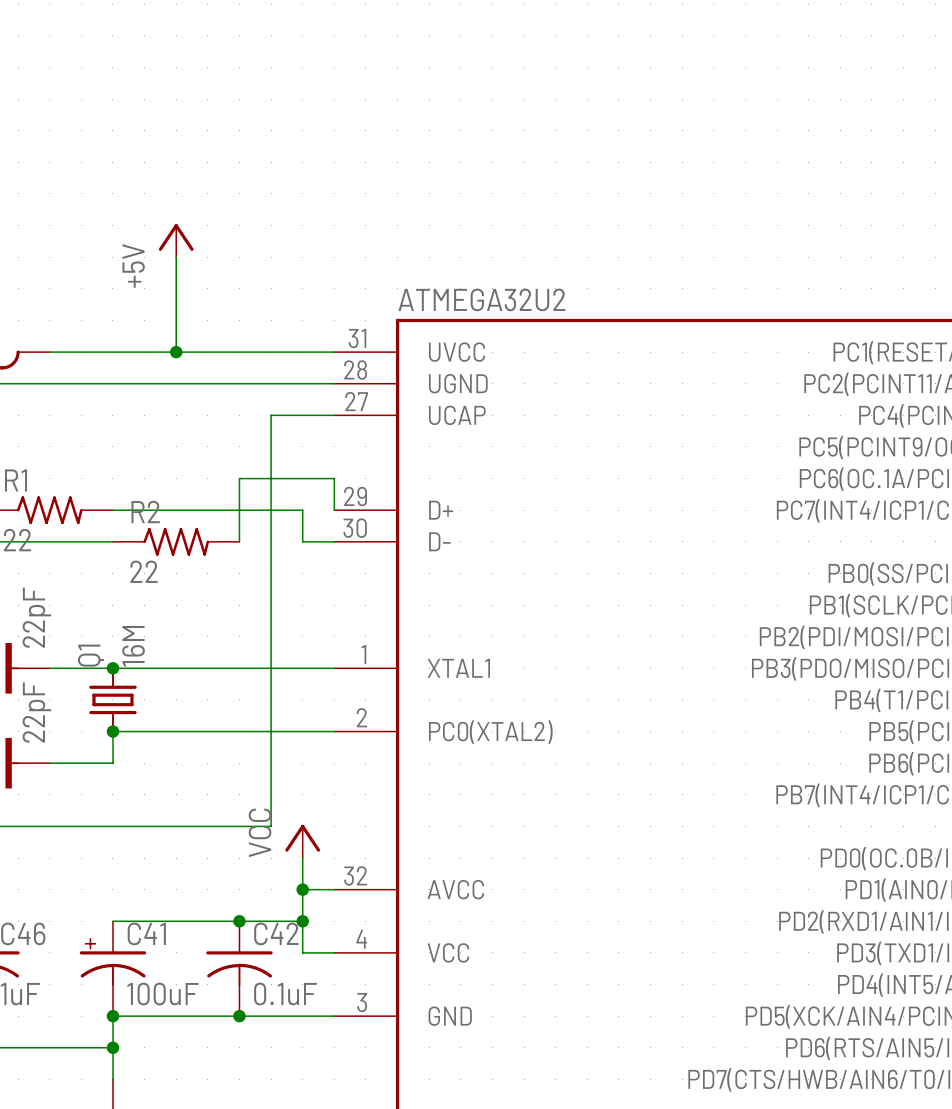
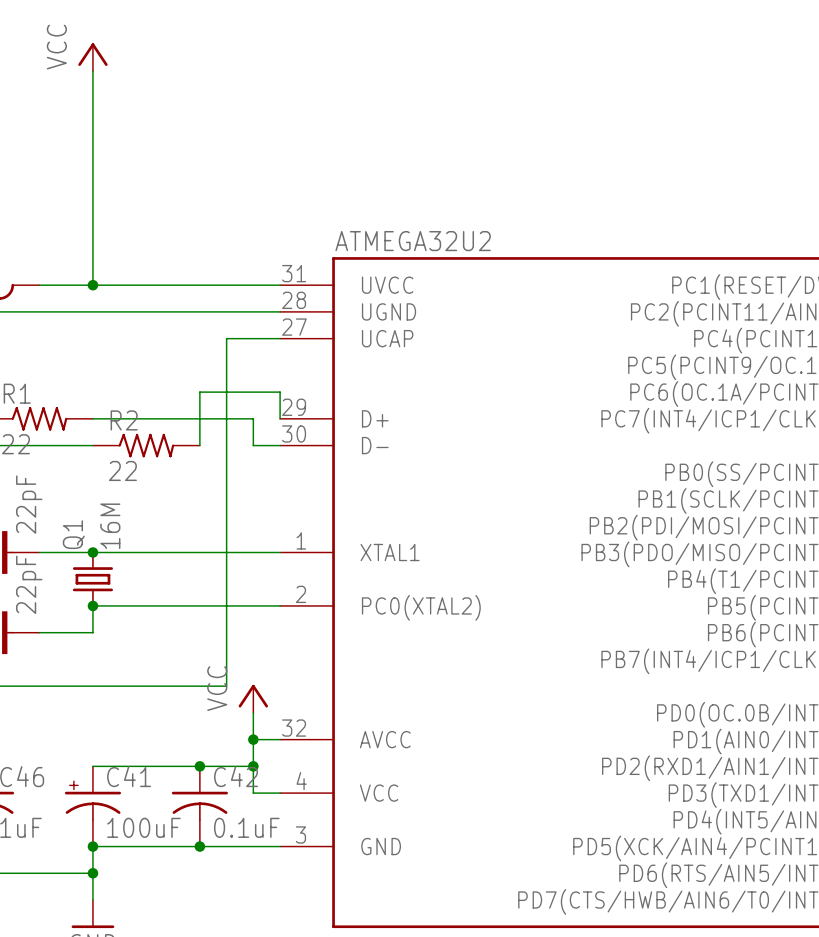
power symbol: none -> VCC (92, 57)
wire: none -> (92, 71) (92, 285)
power symbol: +5V (176, 240) -> none
wire: (176, 257) (176, 352) -> none
junction position: (176, 352) -> (92, 285)

